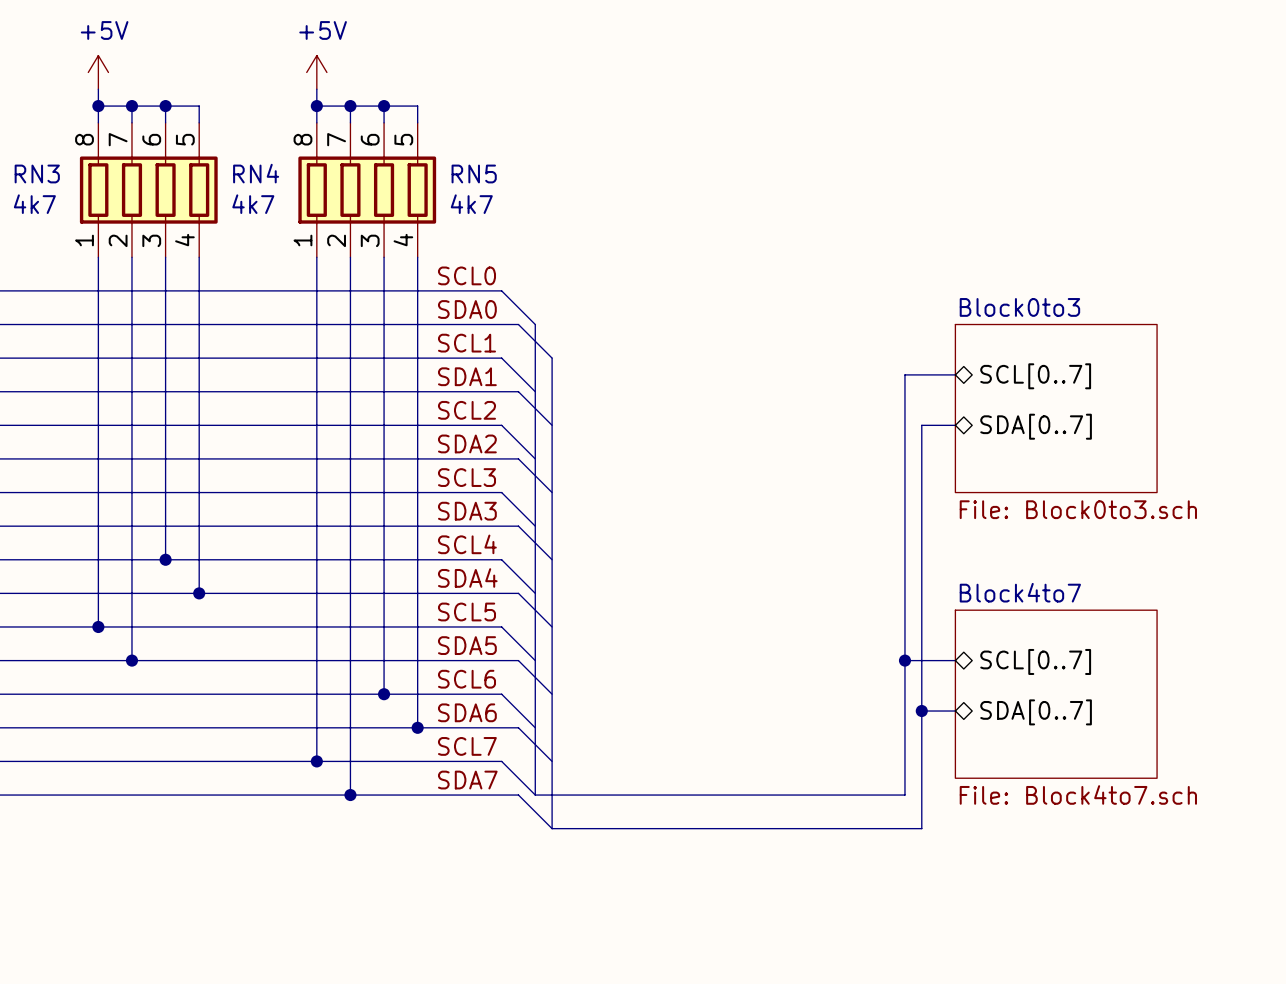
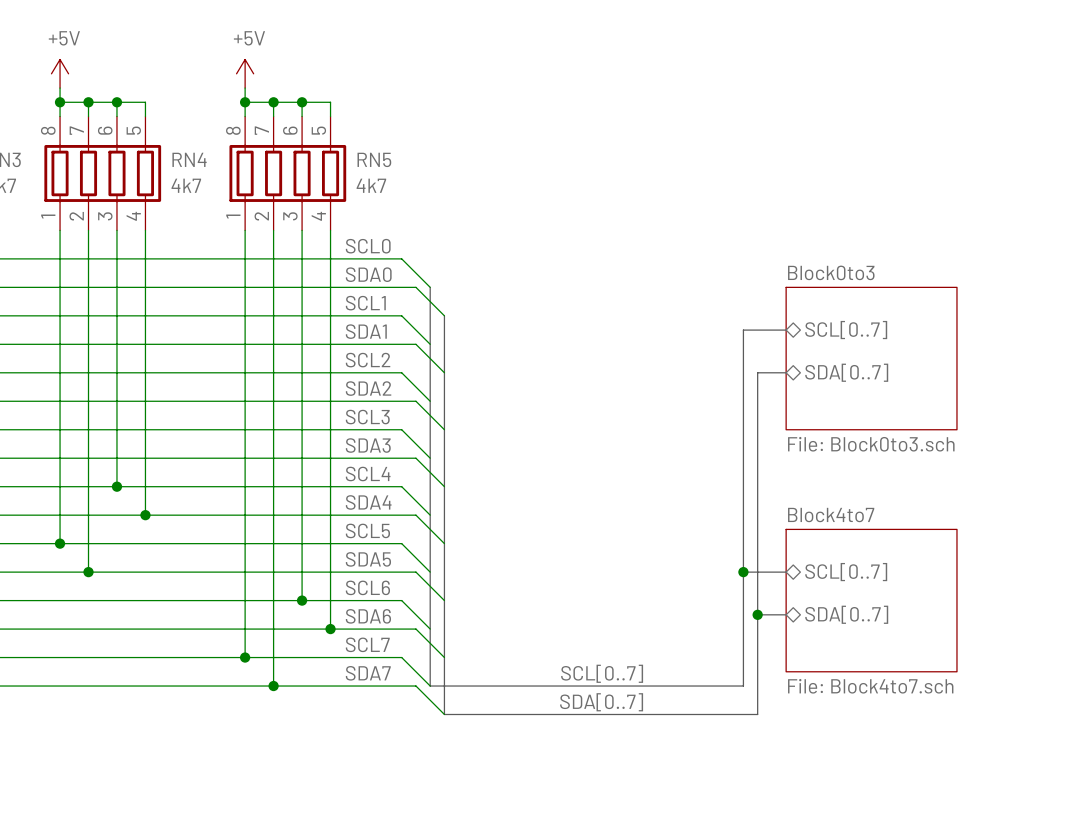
label: none -> SCL[0..7] (602, 673)
label: none -> SDA[0..7] (601, 702)

